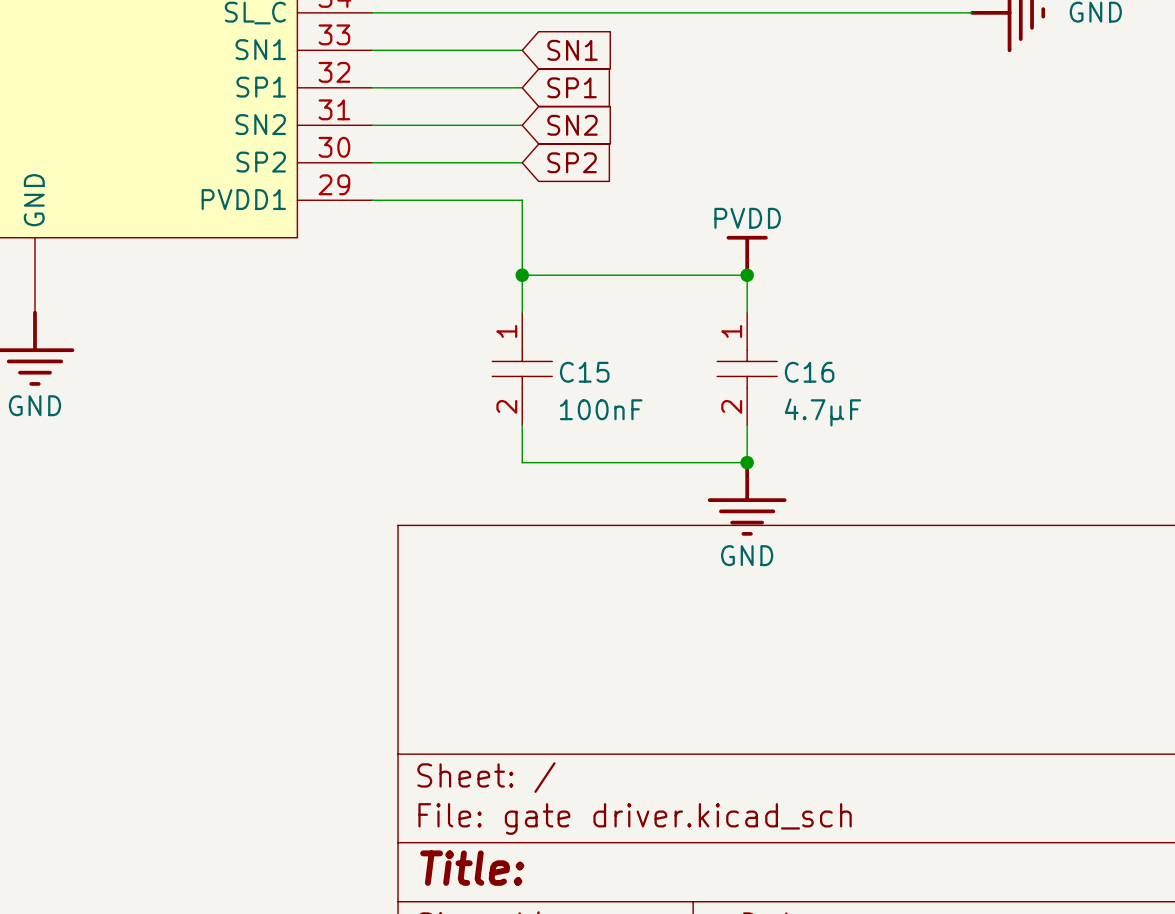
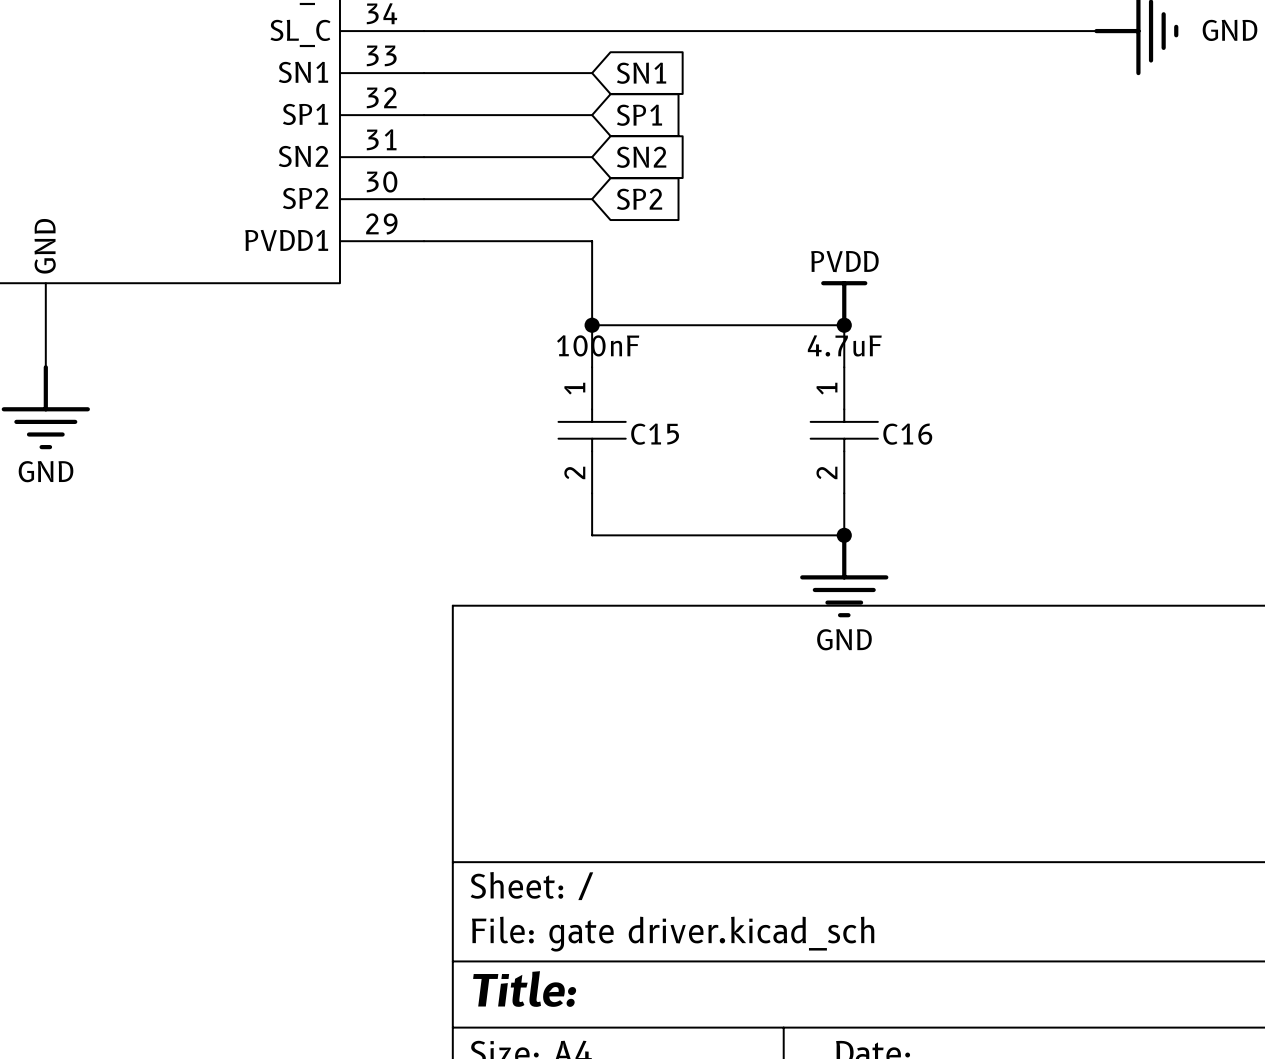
C15 value: none -> 100nF (598, 345)
C16 value: none -> 4.7uF (844, 345)
C15 text: 100nF (601, 409) -> none
C16 text: 4.7µF (822, 412) -> none

